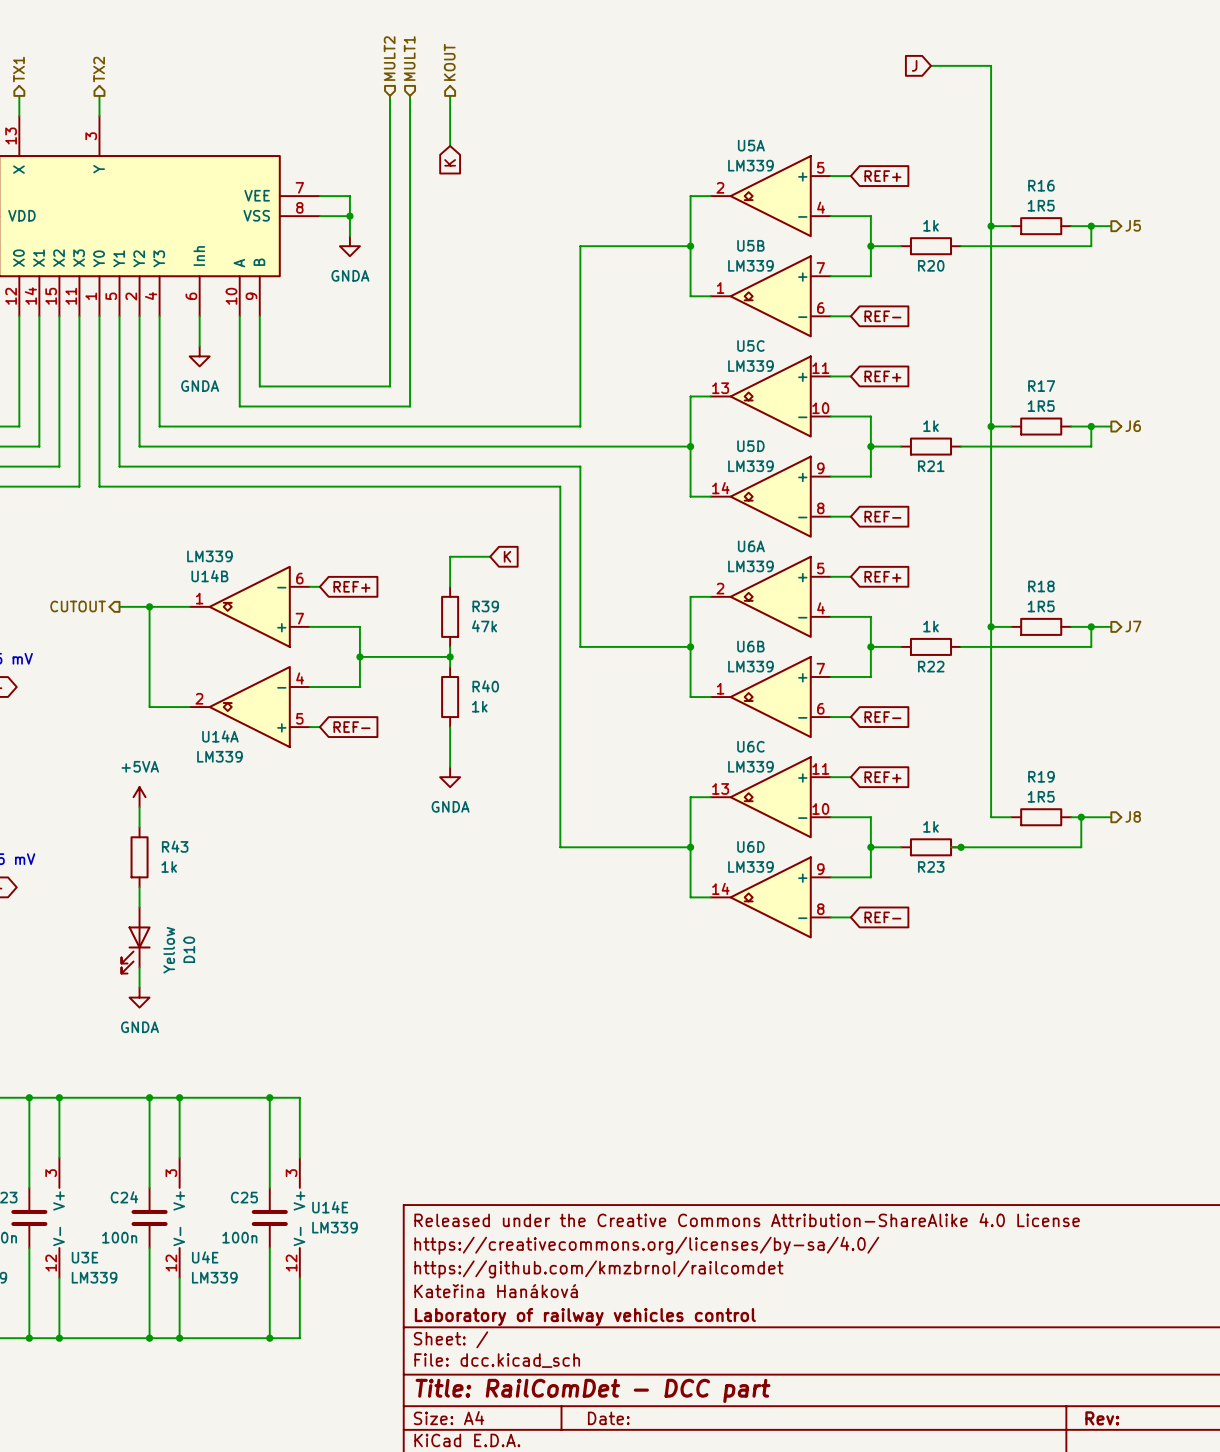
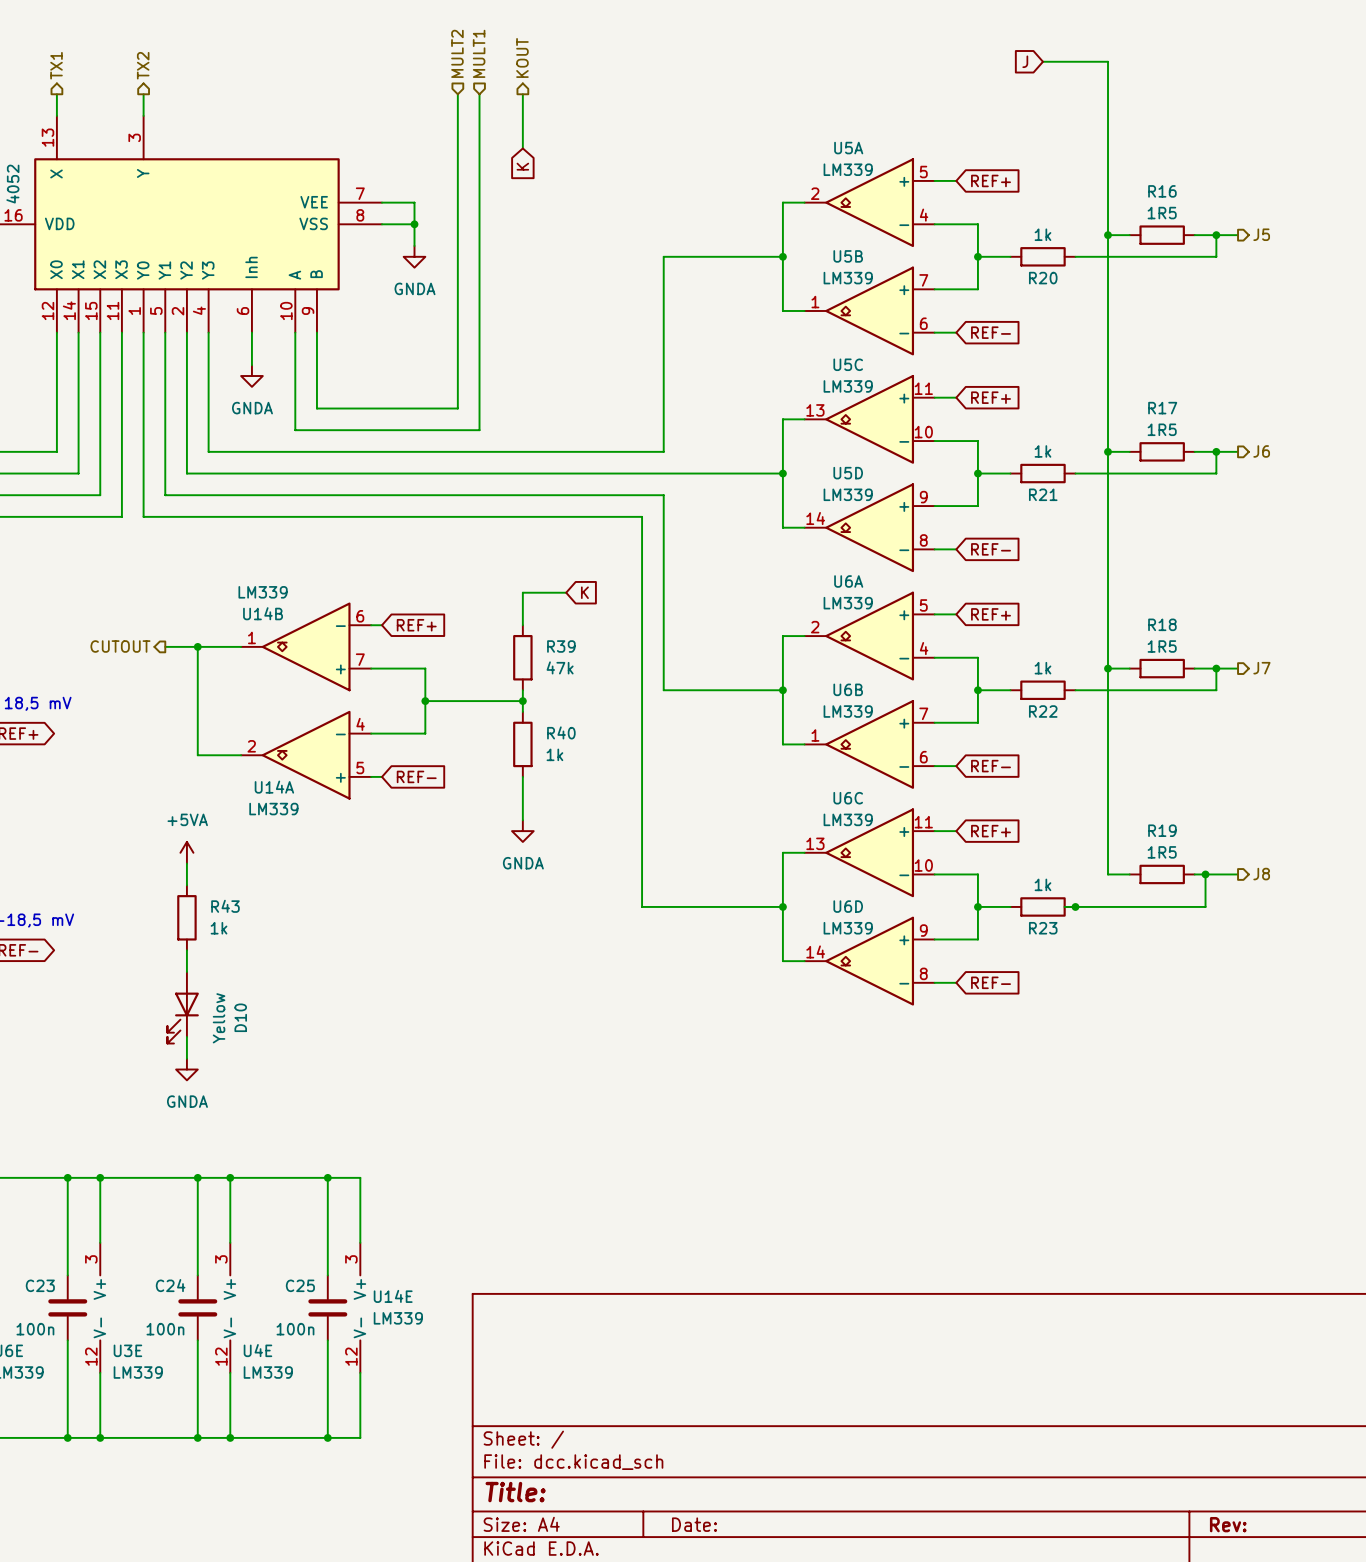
title block: Released under the Creative Commons Attribution-ShareAlike 4.0 License (747, 1220) -> none
title block: https://creativecommons.org/licenses/by-sa/4.0/ (646, 1245) -> none
title block: https://github.com/kmzbrnoI/railcomdet (598, 1269) -> none
title block: Kateřina Hanáková (496, 1291) -> none
title block: Laboratory of railway vehicles control (585, 1317) -> none
title block: Title: RailComDet - DCC part (593, 1390) -> Title: (515, 1492)

